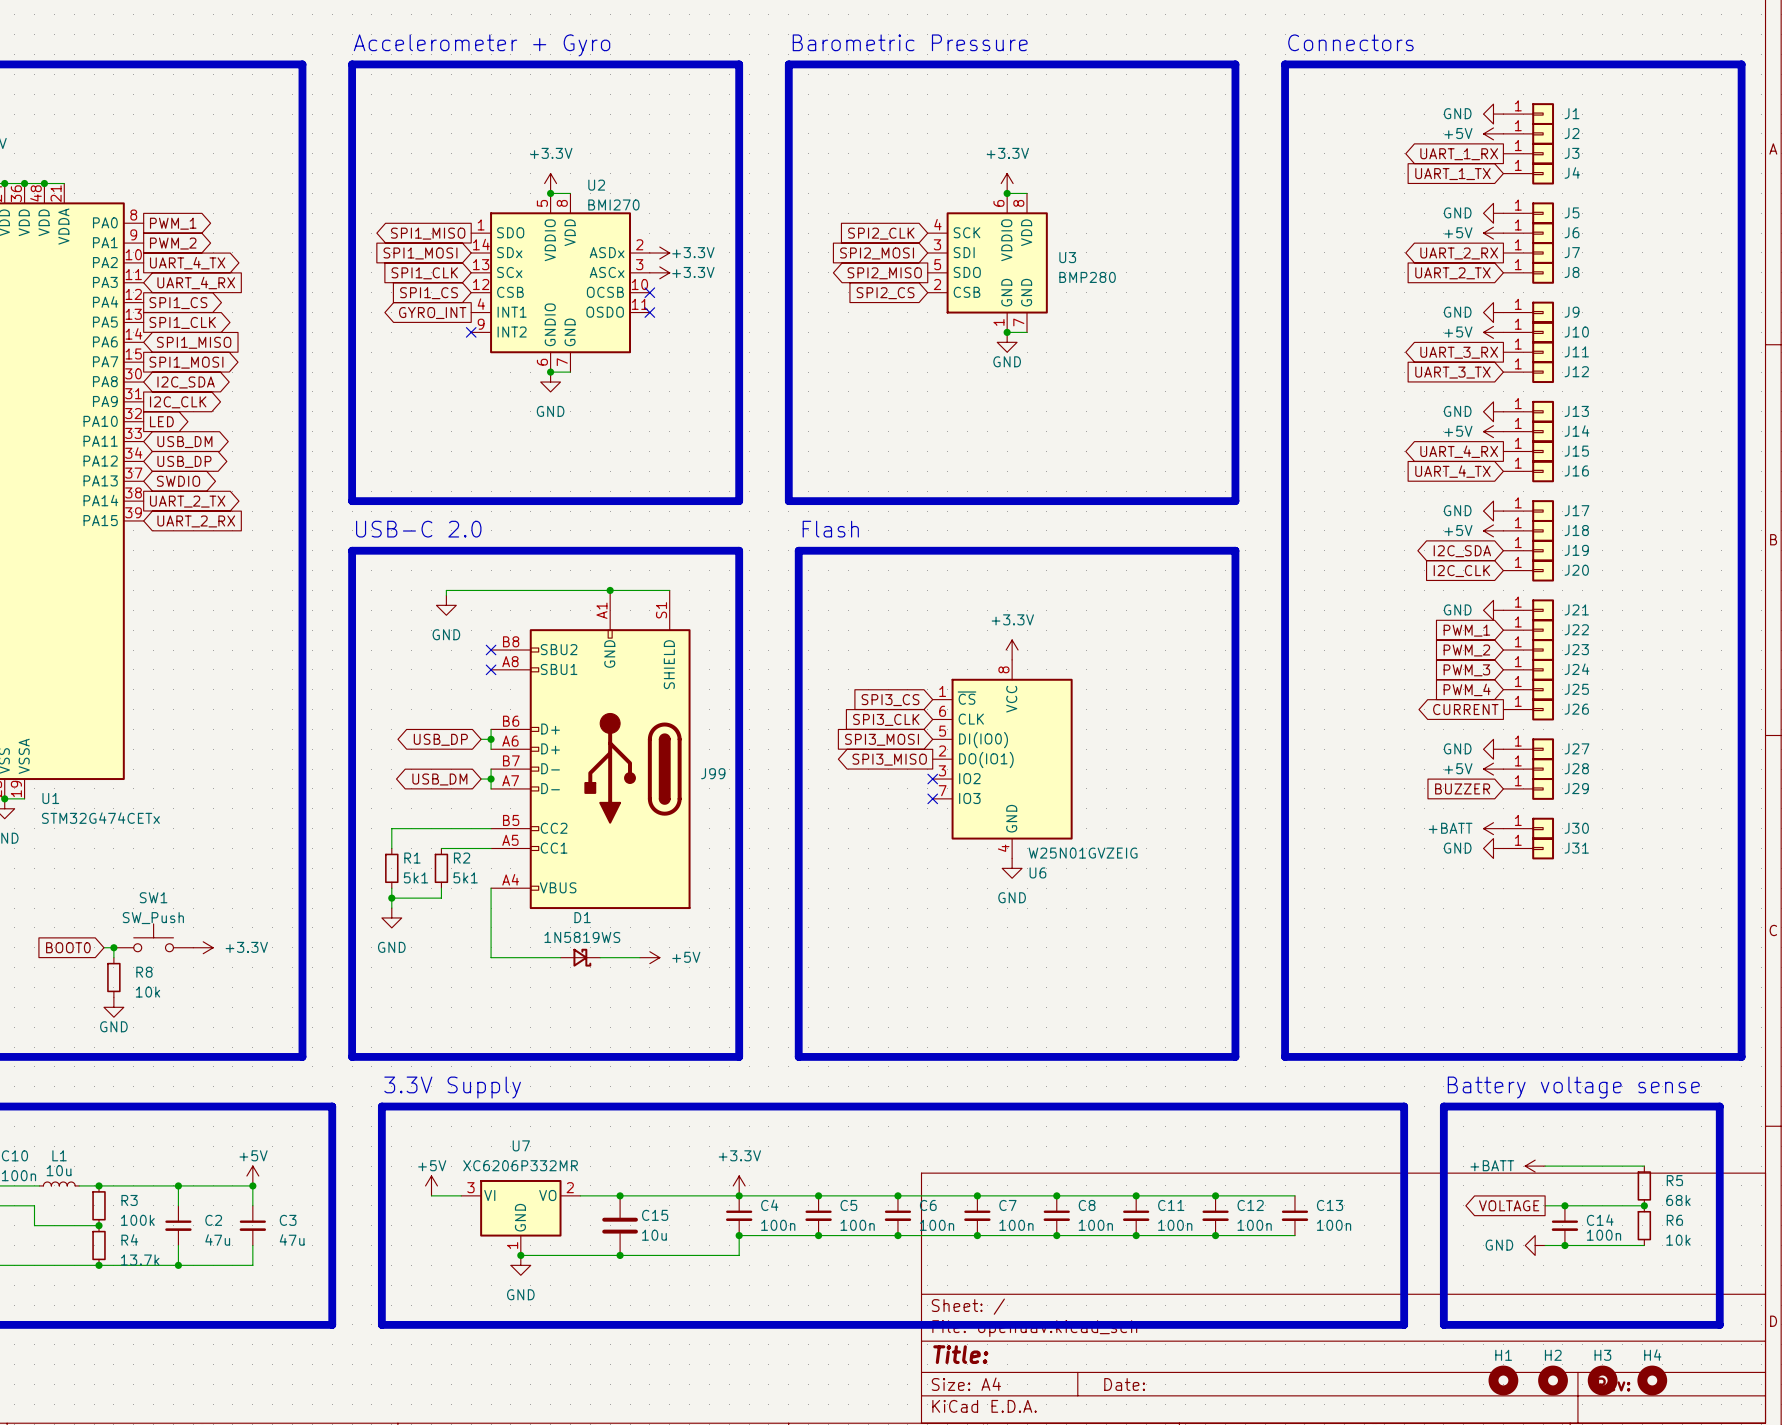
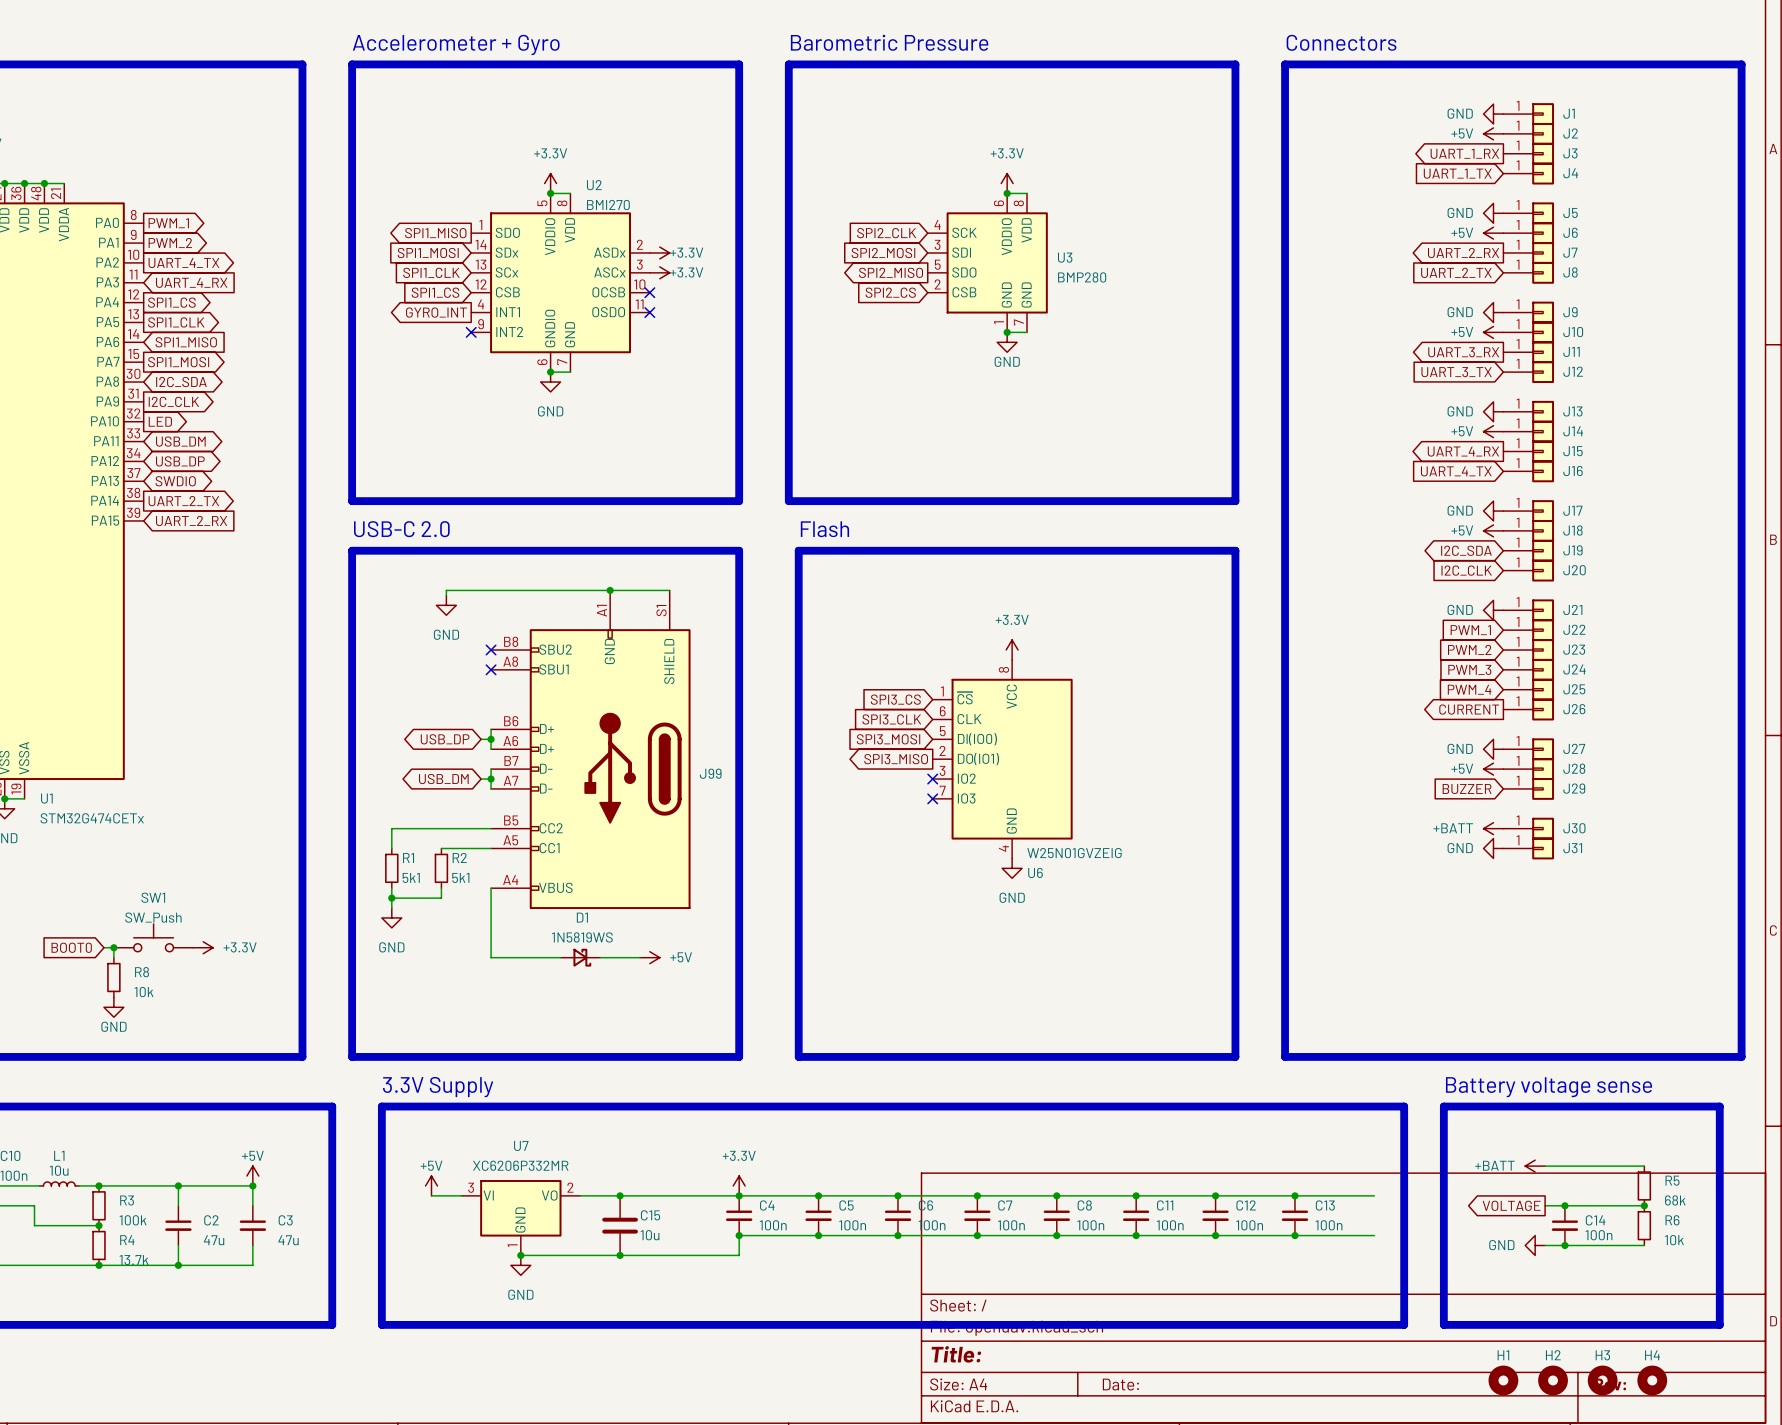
wire: none -> (1294, 1195) (1374, 1195)
junction: none -> (1294, 1195)
wire: none -> (1294, 1235) (1374, 1235)
junction: none -> (1294, 1235)

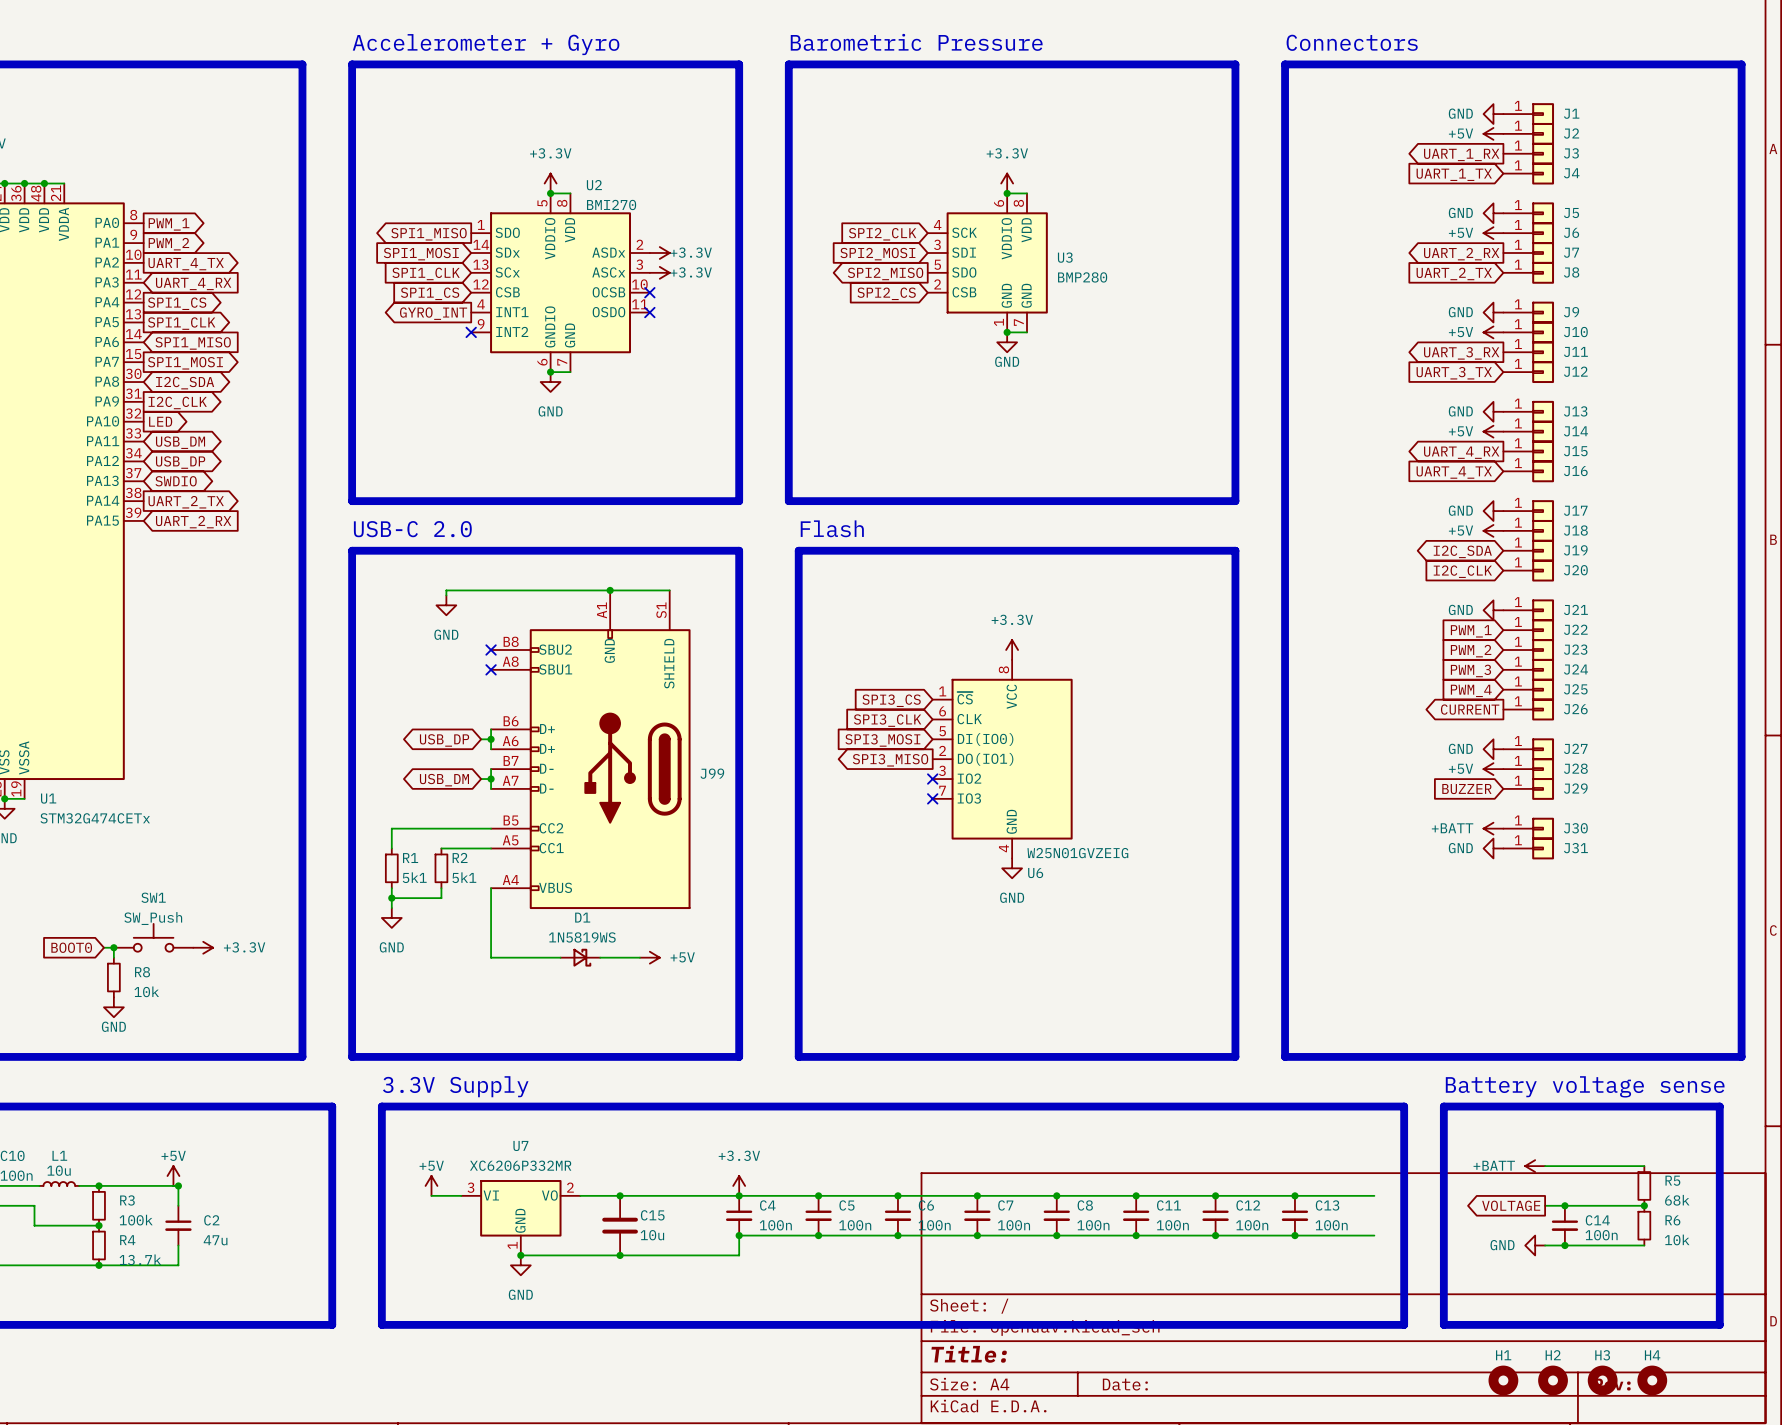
power symbol position: +5V (252, 1176) -> +5V (173, 1176)
wire: (178, 1185) (252, 1185) (252, 1205) -> none
junction: (252, 1185) -> none
C3: 47u (252, 1225) -> none
wire: (252, 1245) (252, 1265) (178, 1265) -> none
junction: (178, 1265) -> none

